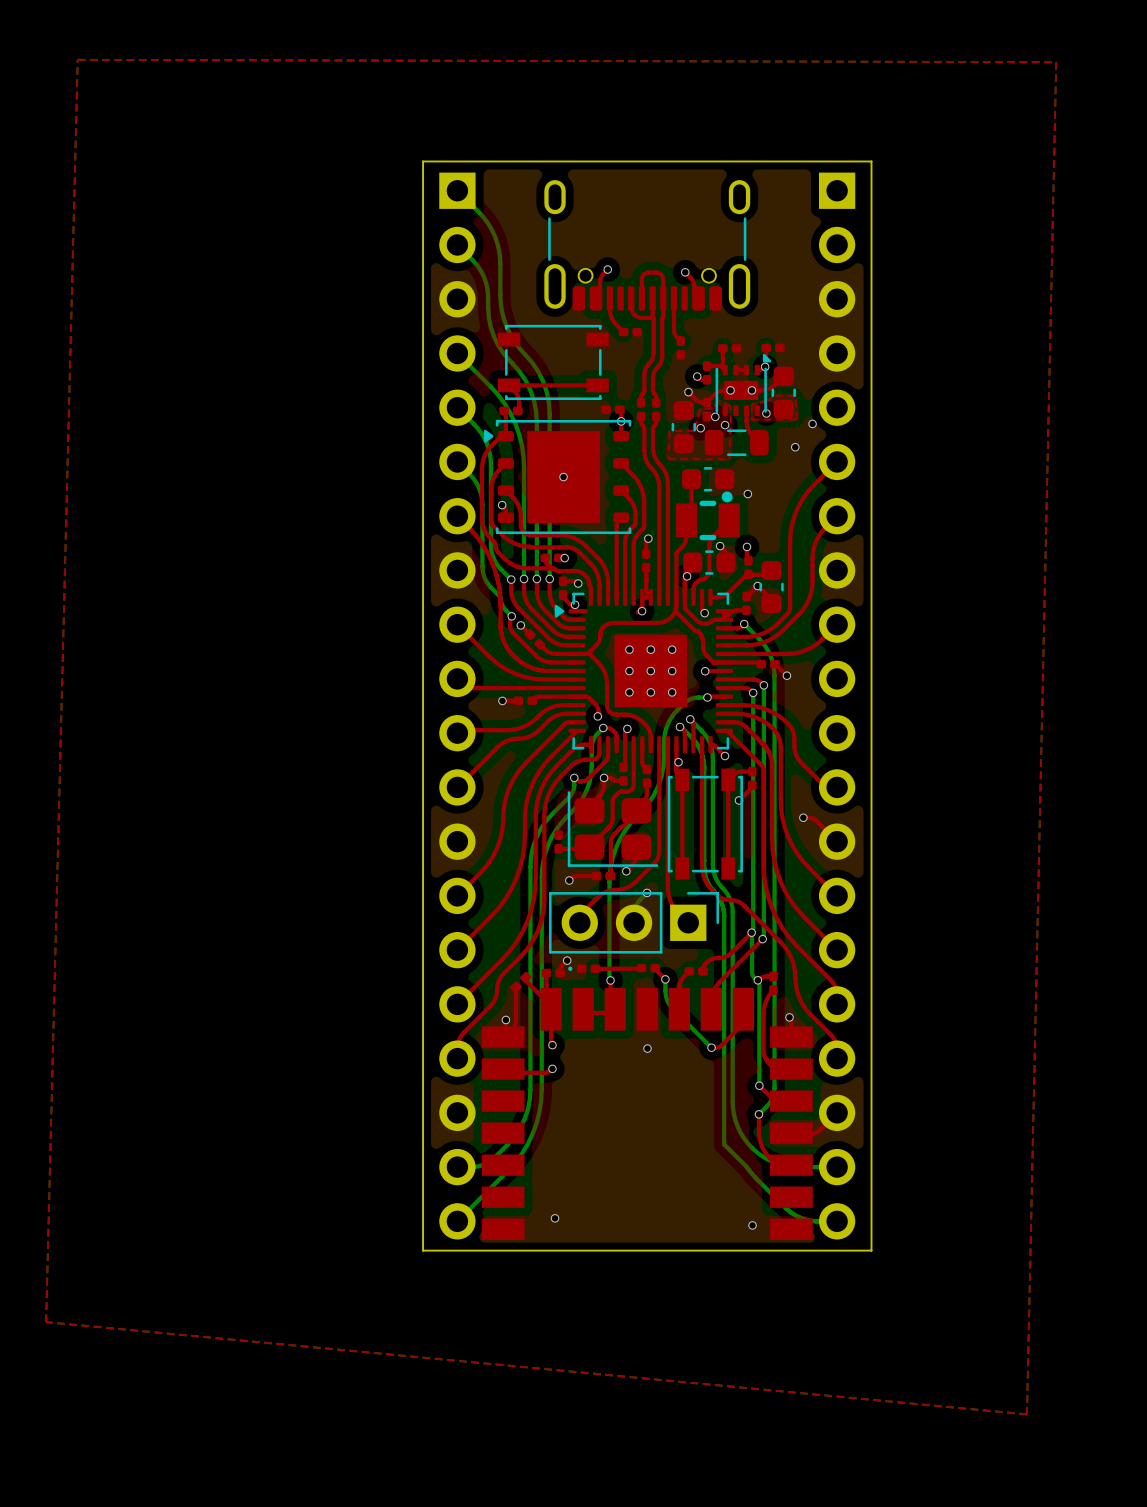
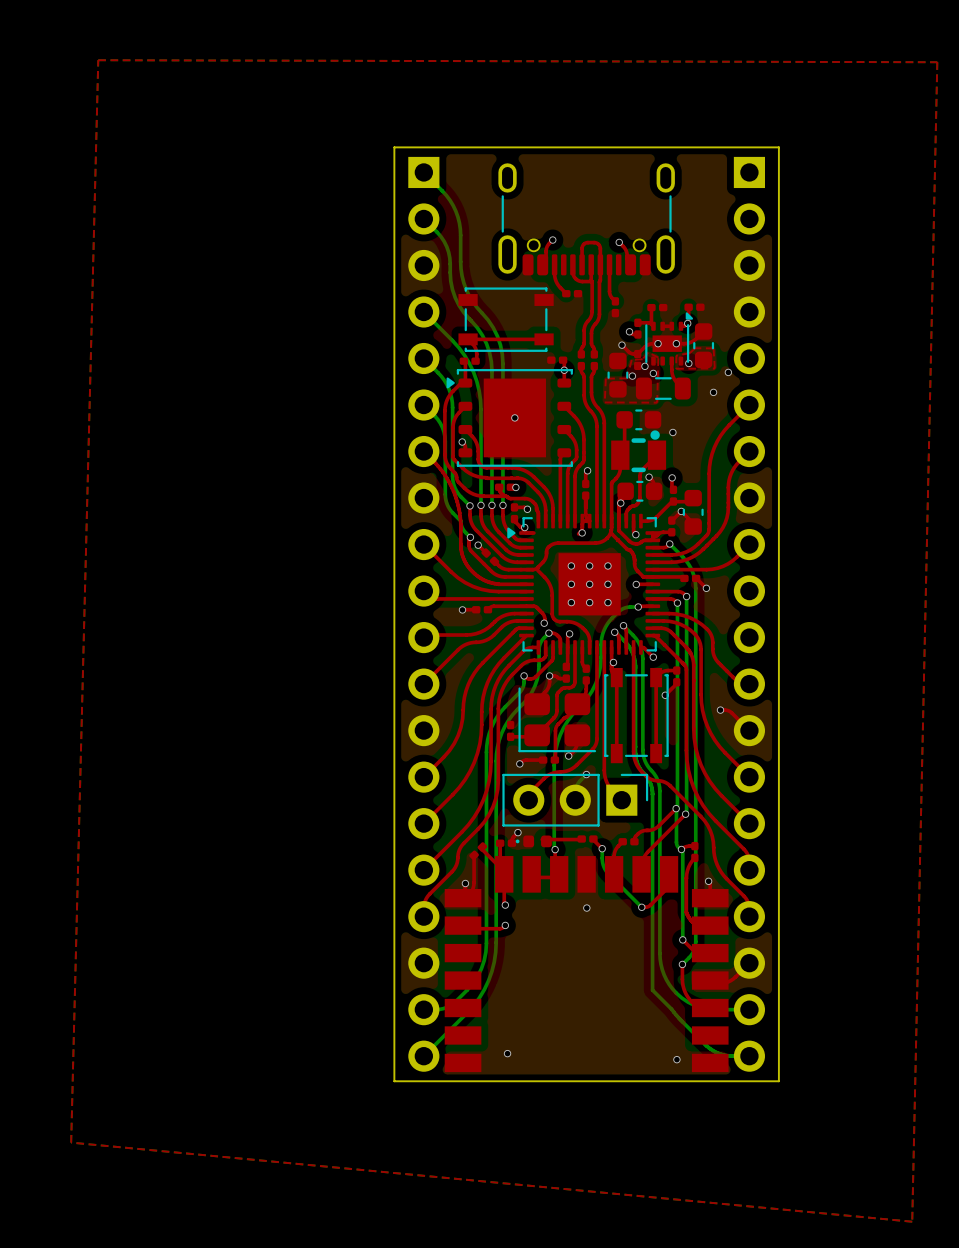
part footprint: [568, 964, 601, 973] -> [515, 835, 552, 848]

